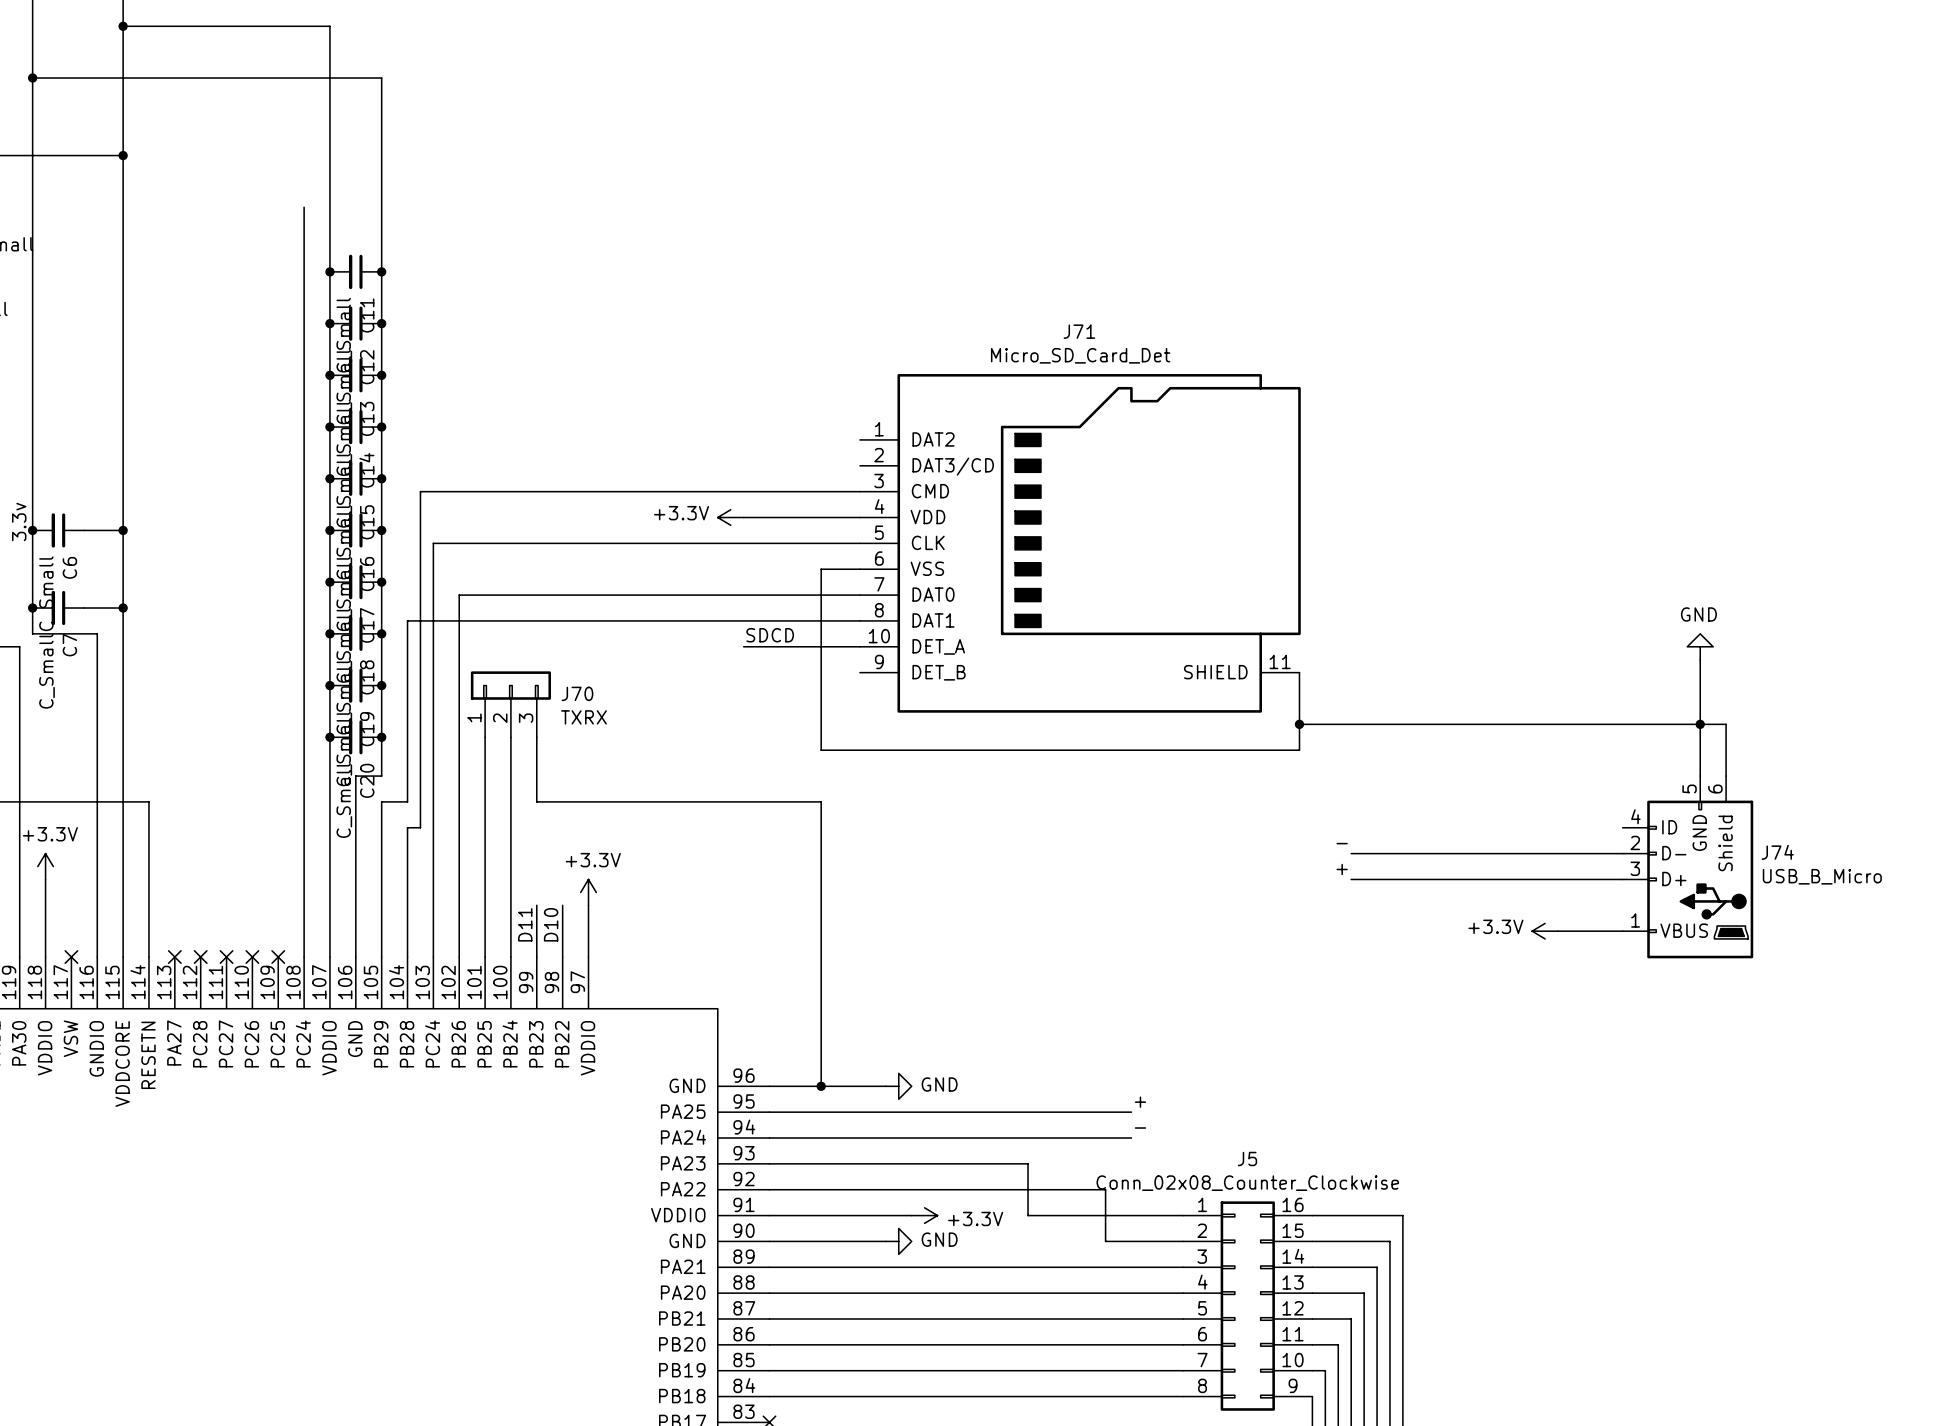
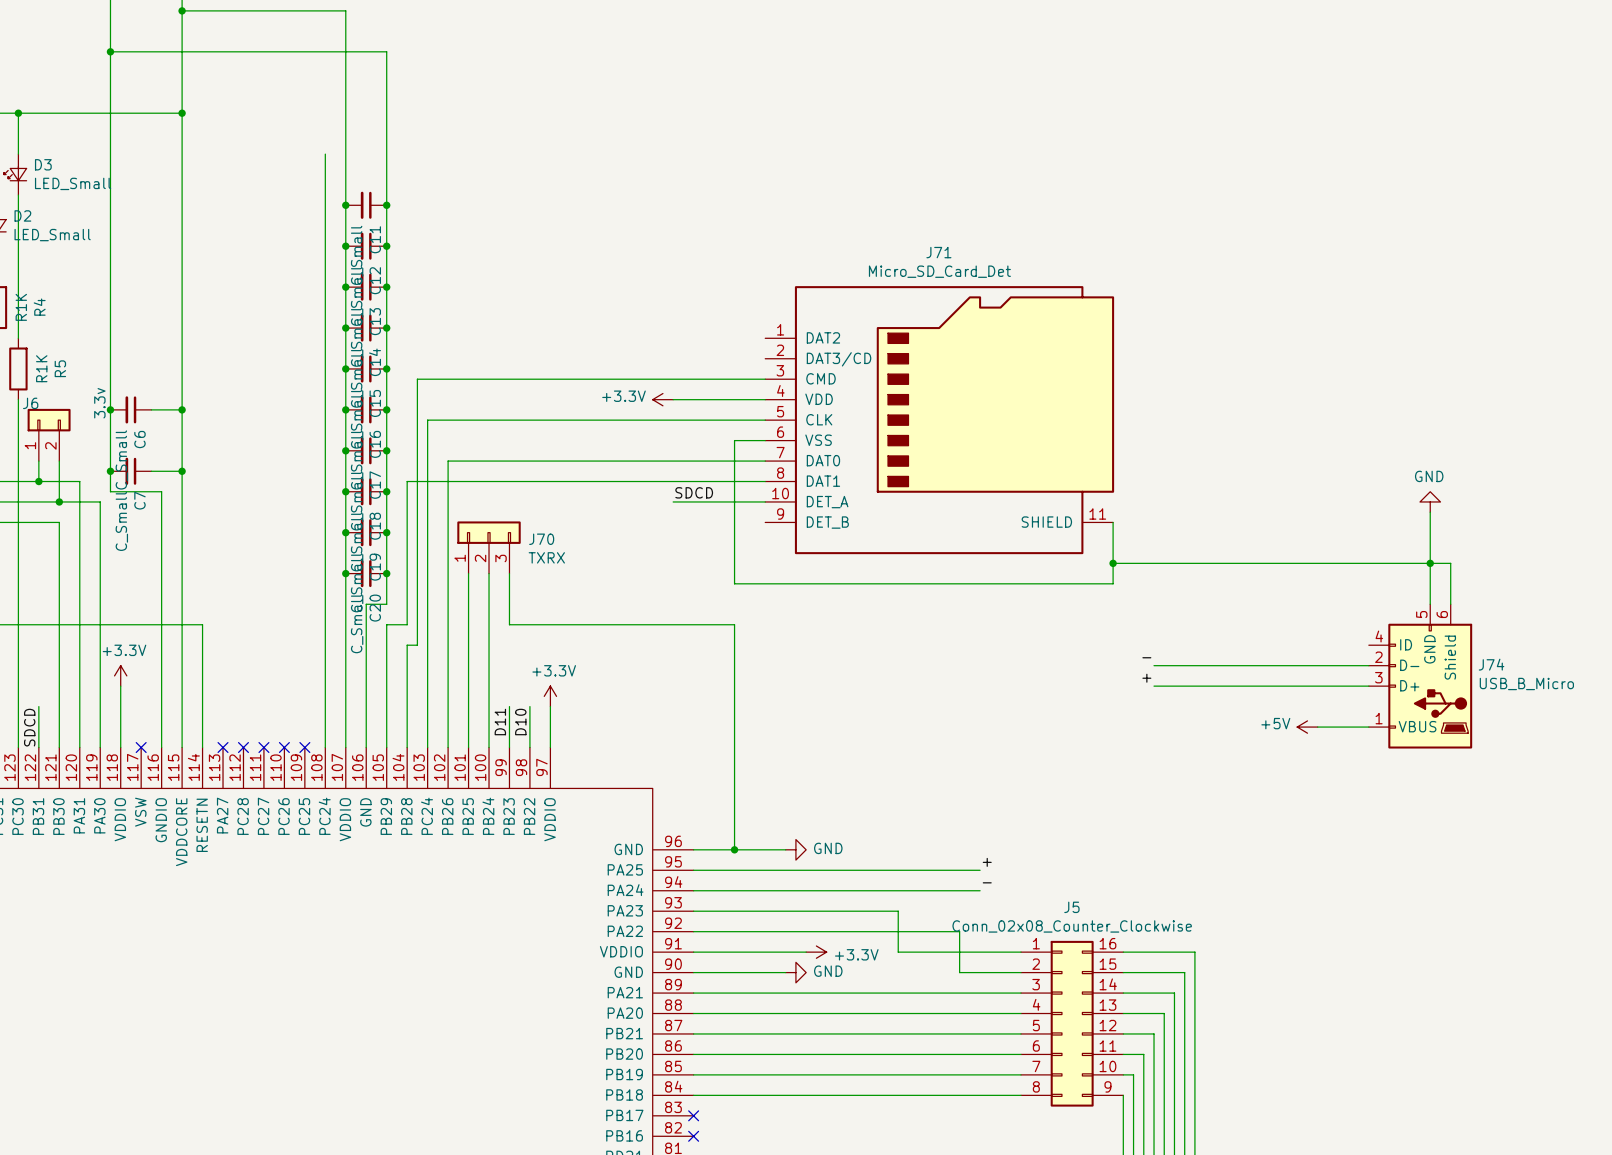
power symbol: +3.3V (1545, 931) -> +5V (1307, 727)

